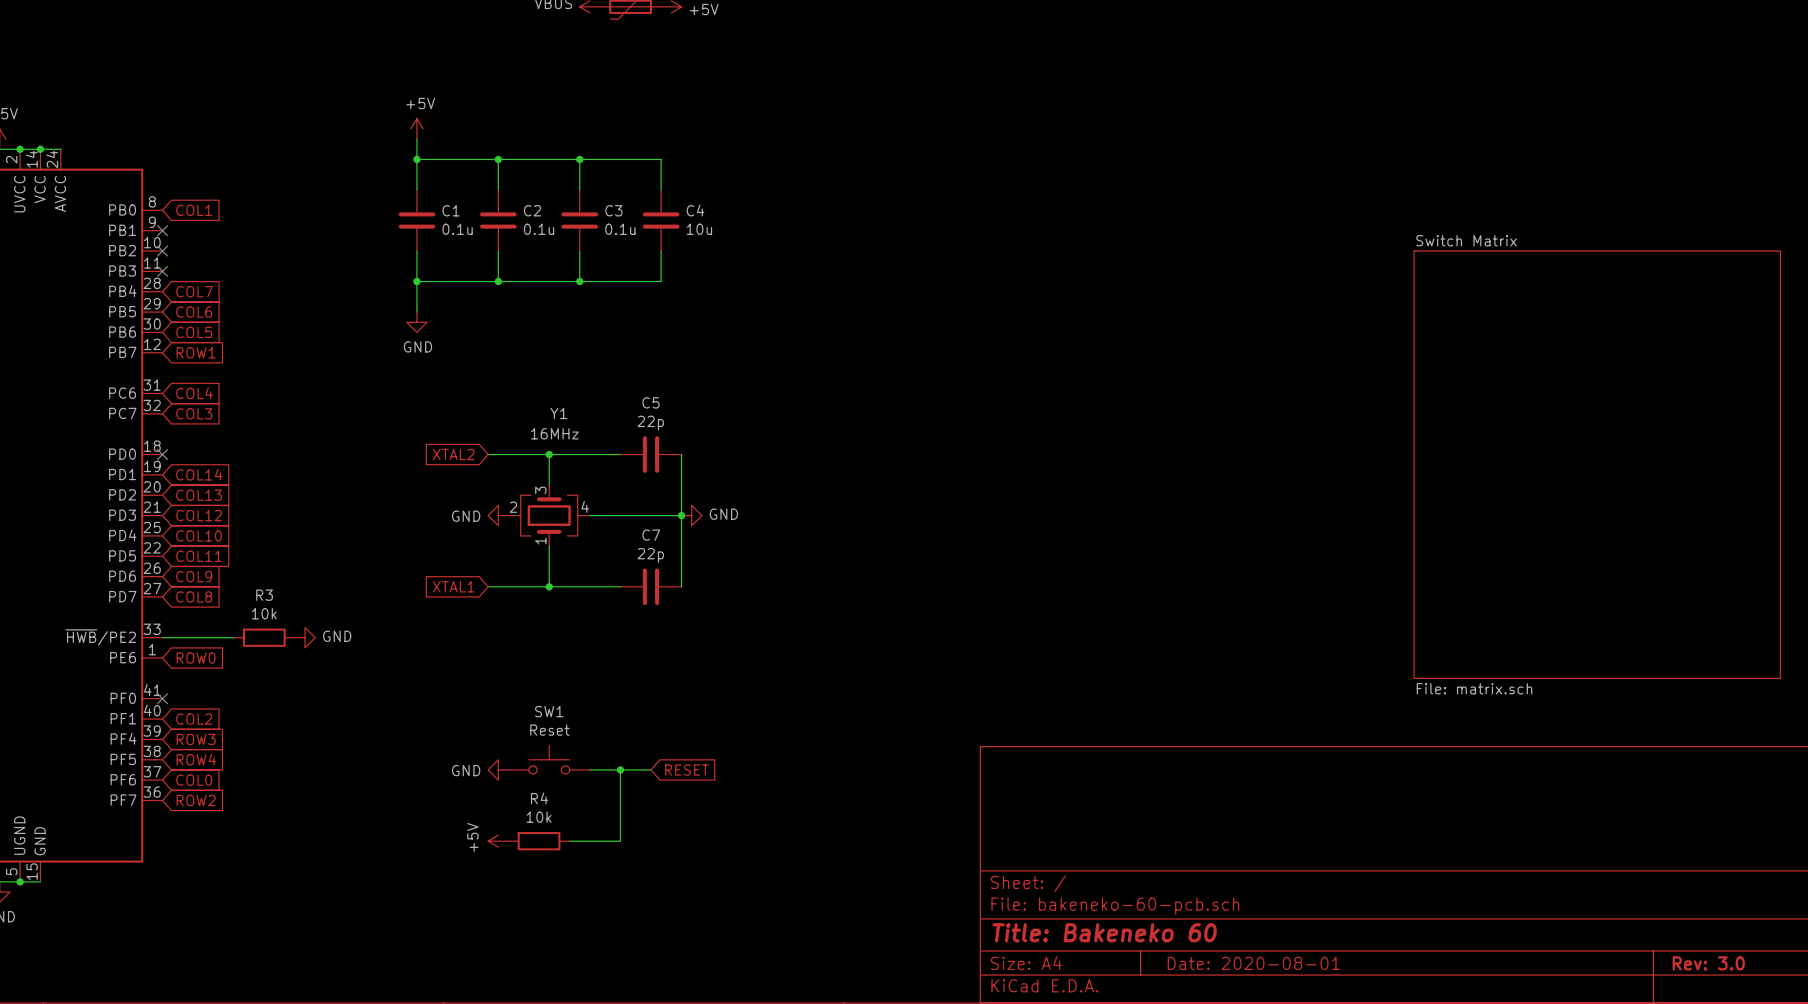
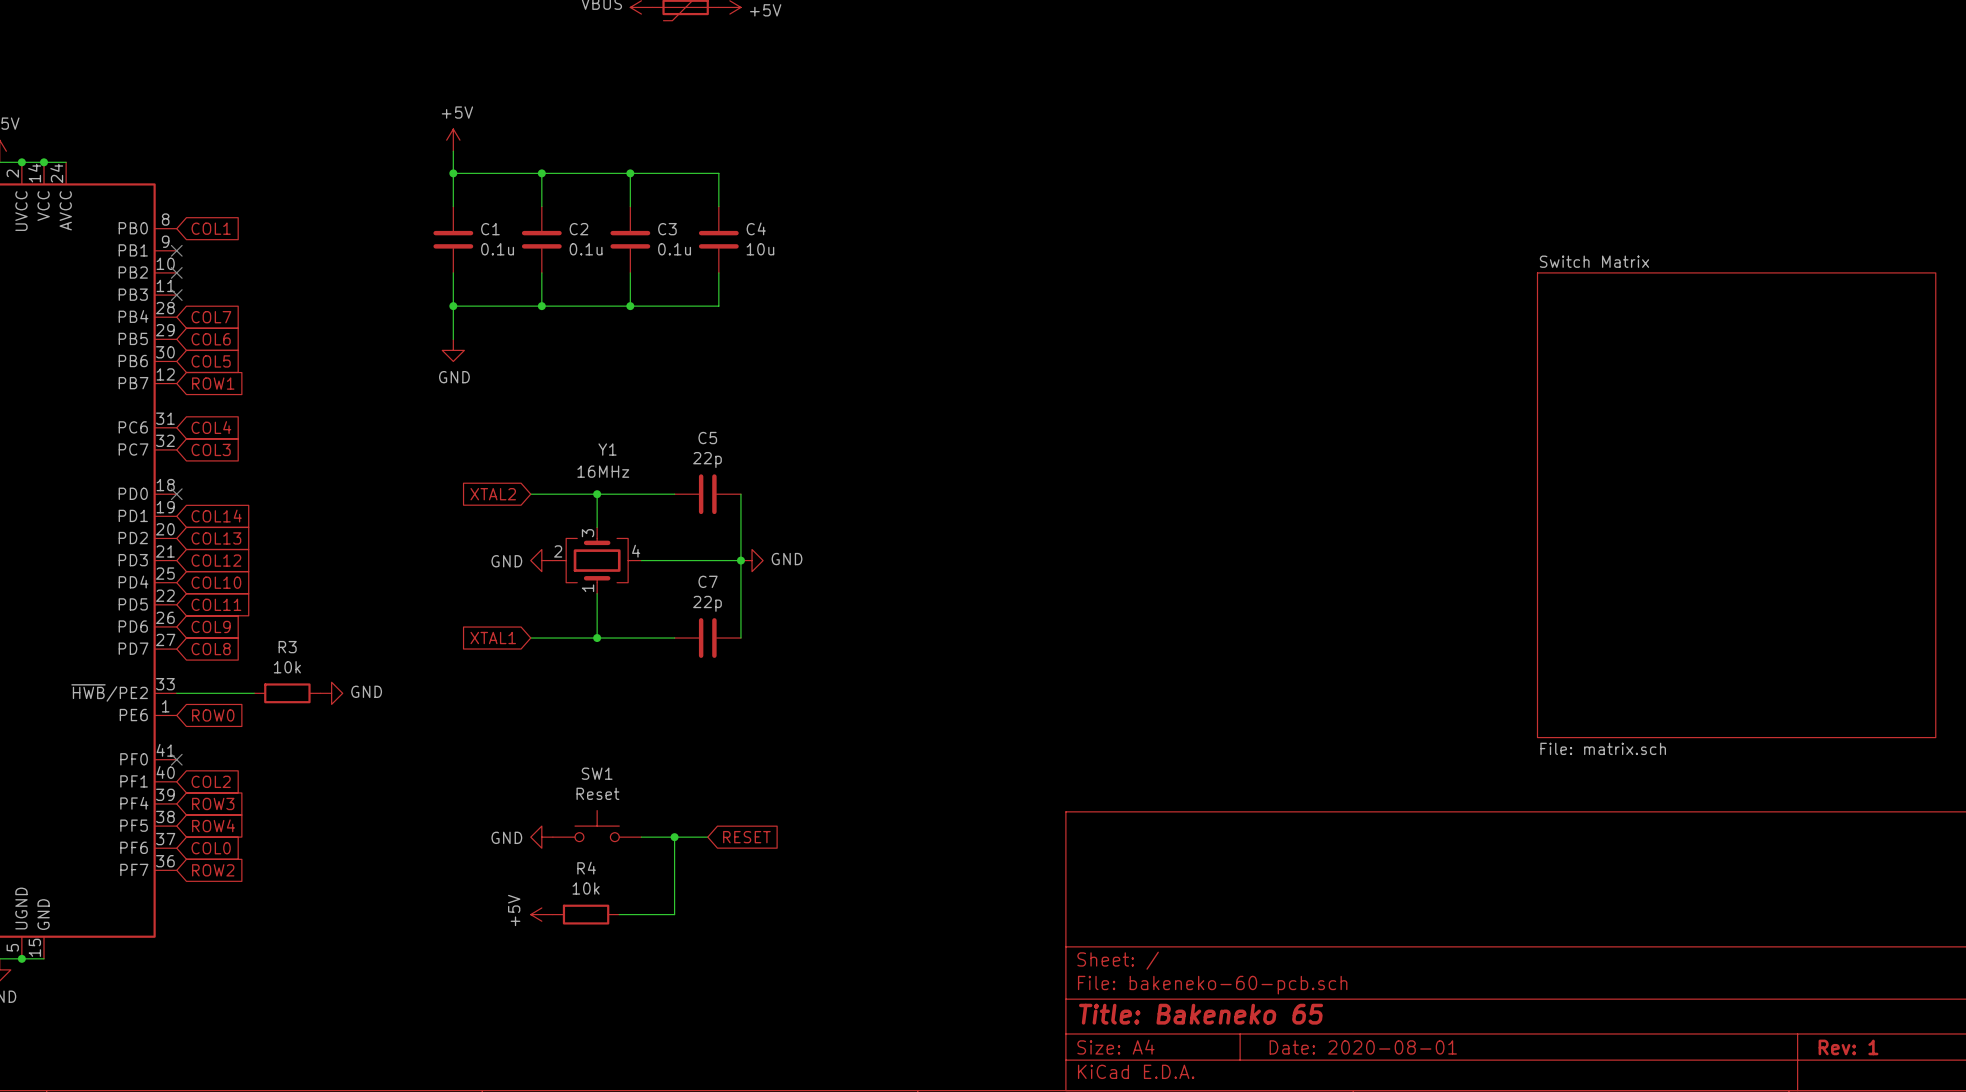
title block: Title: Bakeneko 60 (1104, 932) -> Title: Bakeneko 65 (1201, 1014)
title block: Rev: 3.0 (1708, 963) -> Rev: 1 (1848, 1047)

